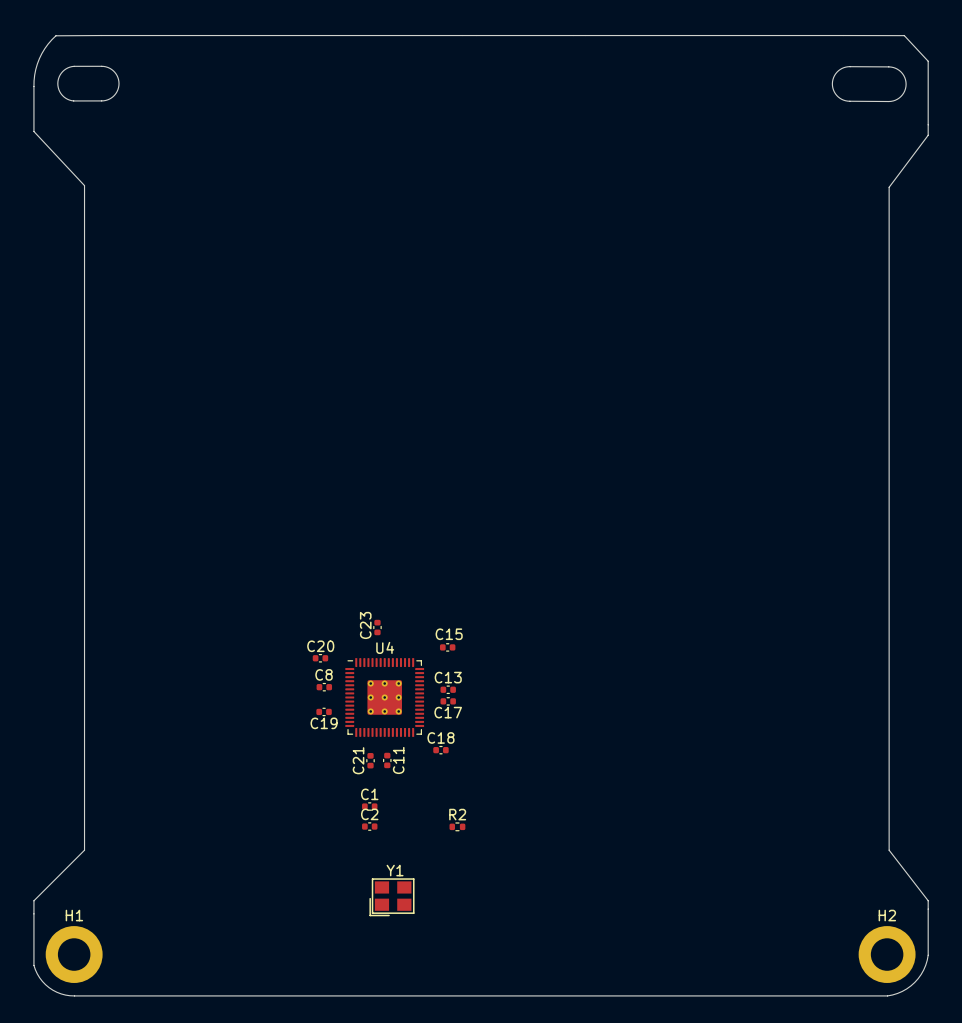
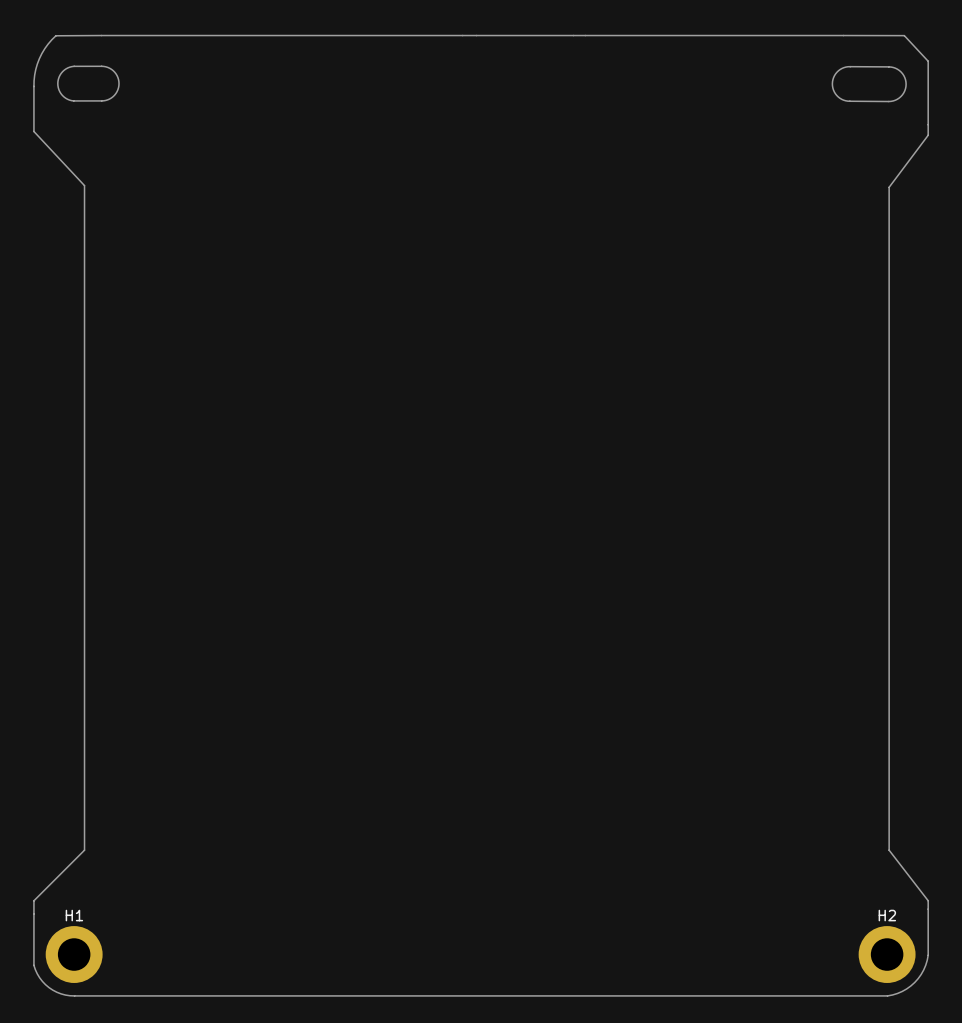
C23: (377, 627) -> none
C15: (447, 647) -> none
C20: (320, 658) -> none
C8: (324, 687) -> none
C13: (448, 689) -> none
U4: (384, 697) -> none
C17: (448, 701) -> none
C19: (324, 711) -> none
C18: (440, 750) -> none
C21: (370, 760) -> none
C11: (387, 760) -> none
C1: (369, 806) -> none
C2: (369, 826) -> none
R2: (457, 826) -> none
Y1: (391, 897) -> none

